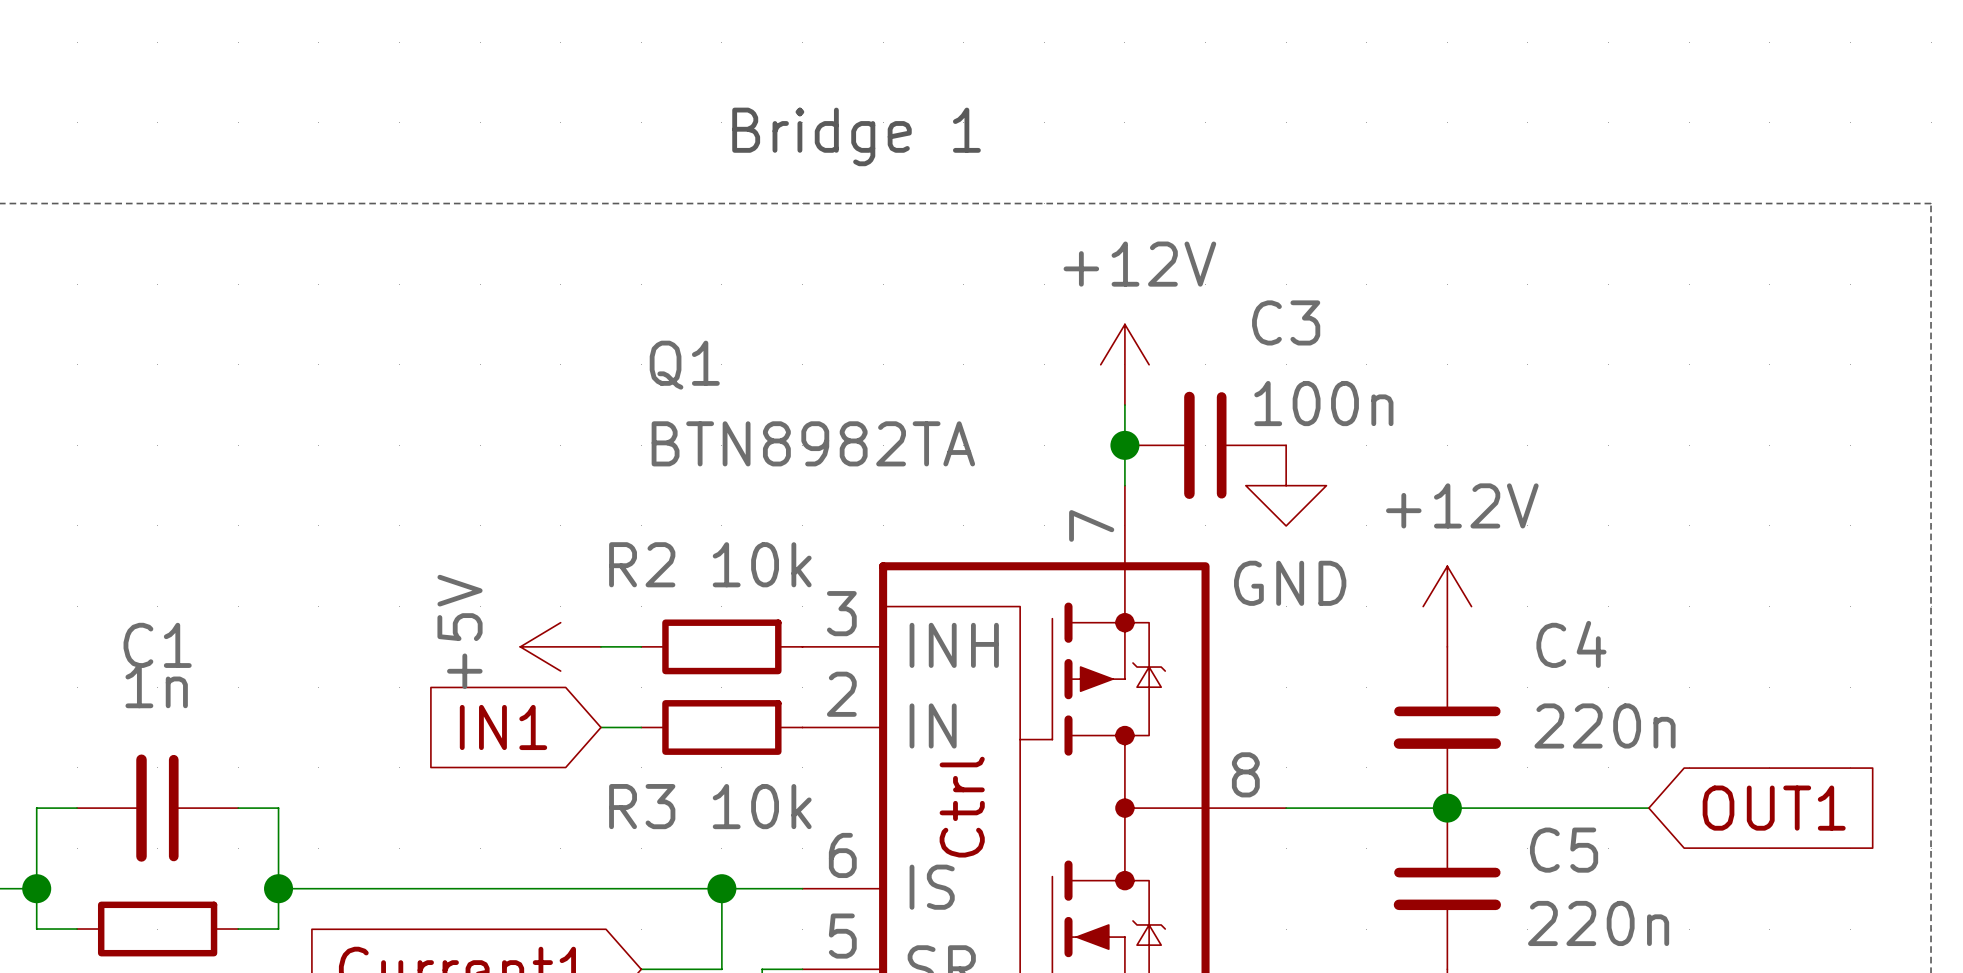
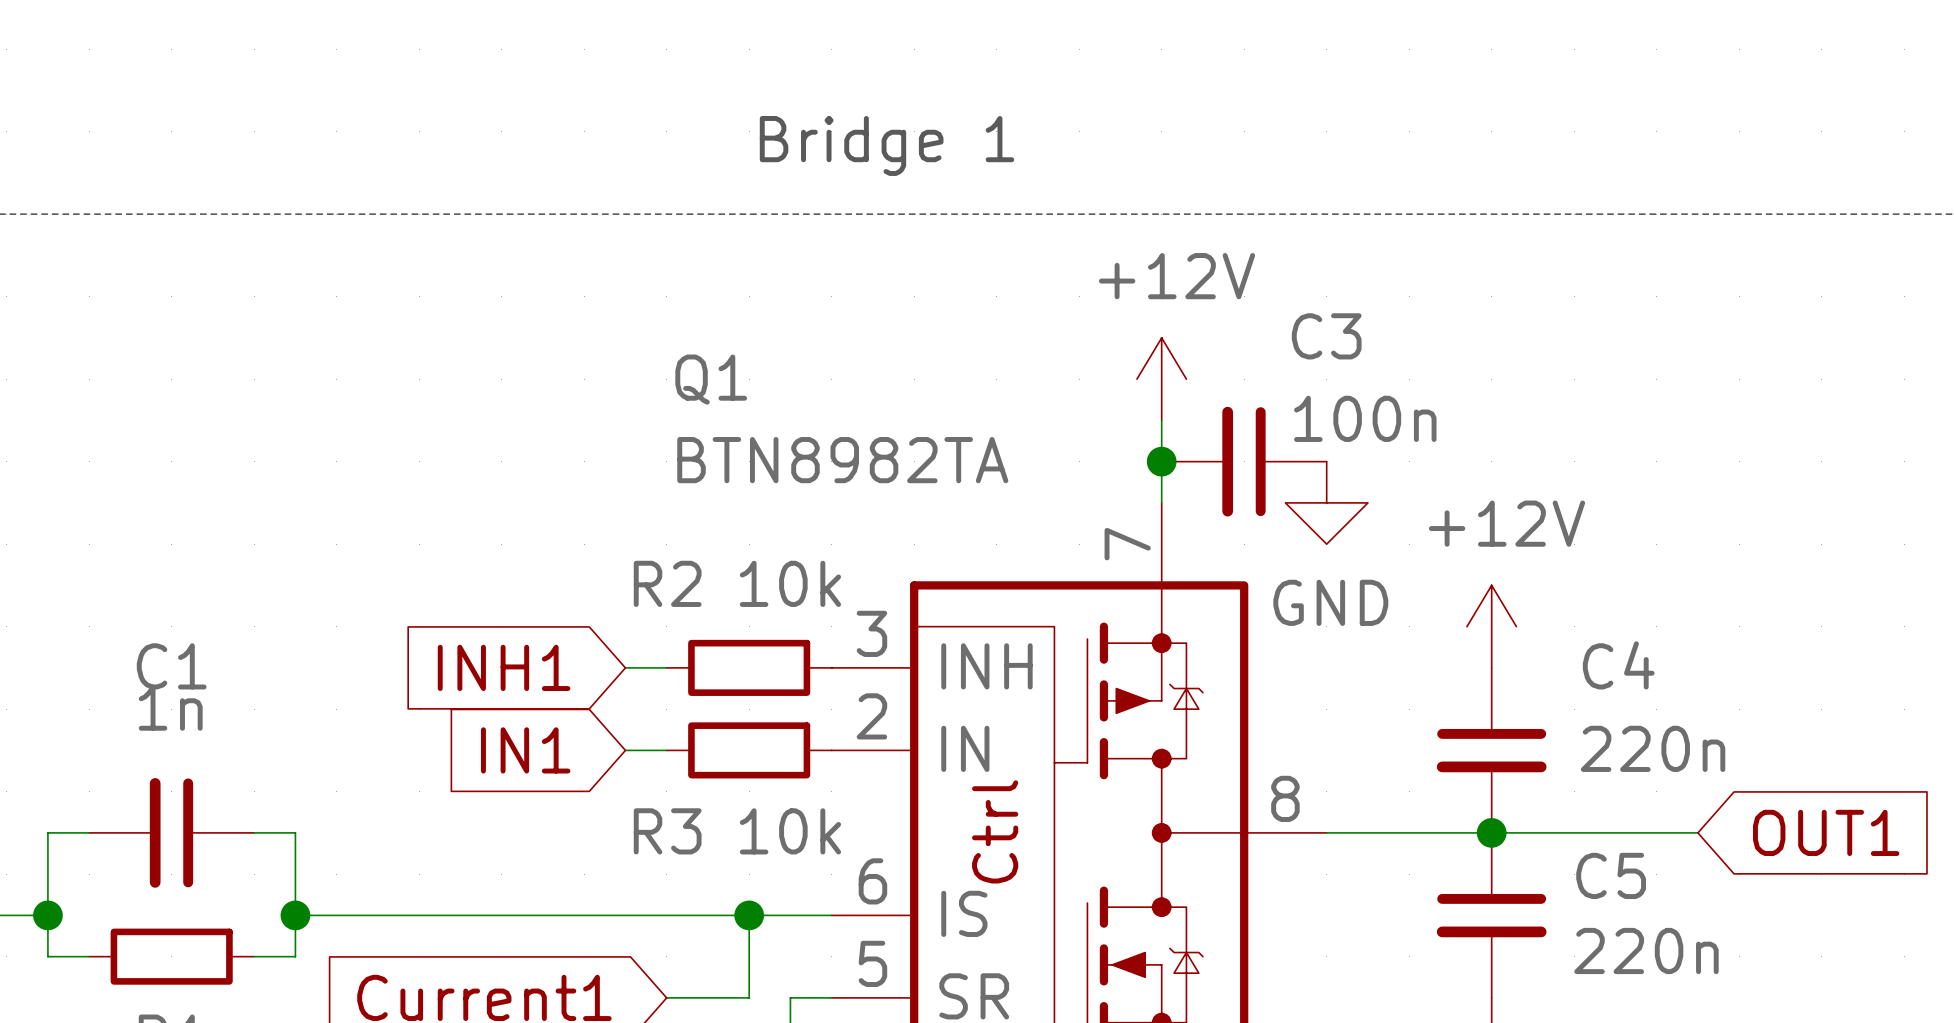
global label: none -> INH1 (504, 667)
power symbol: +5V (560, 646) -> none

